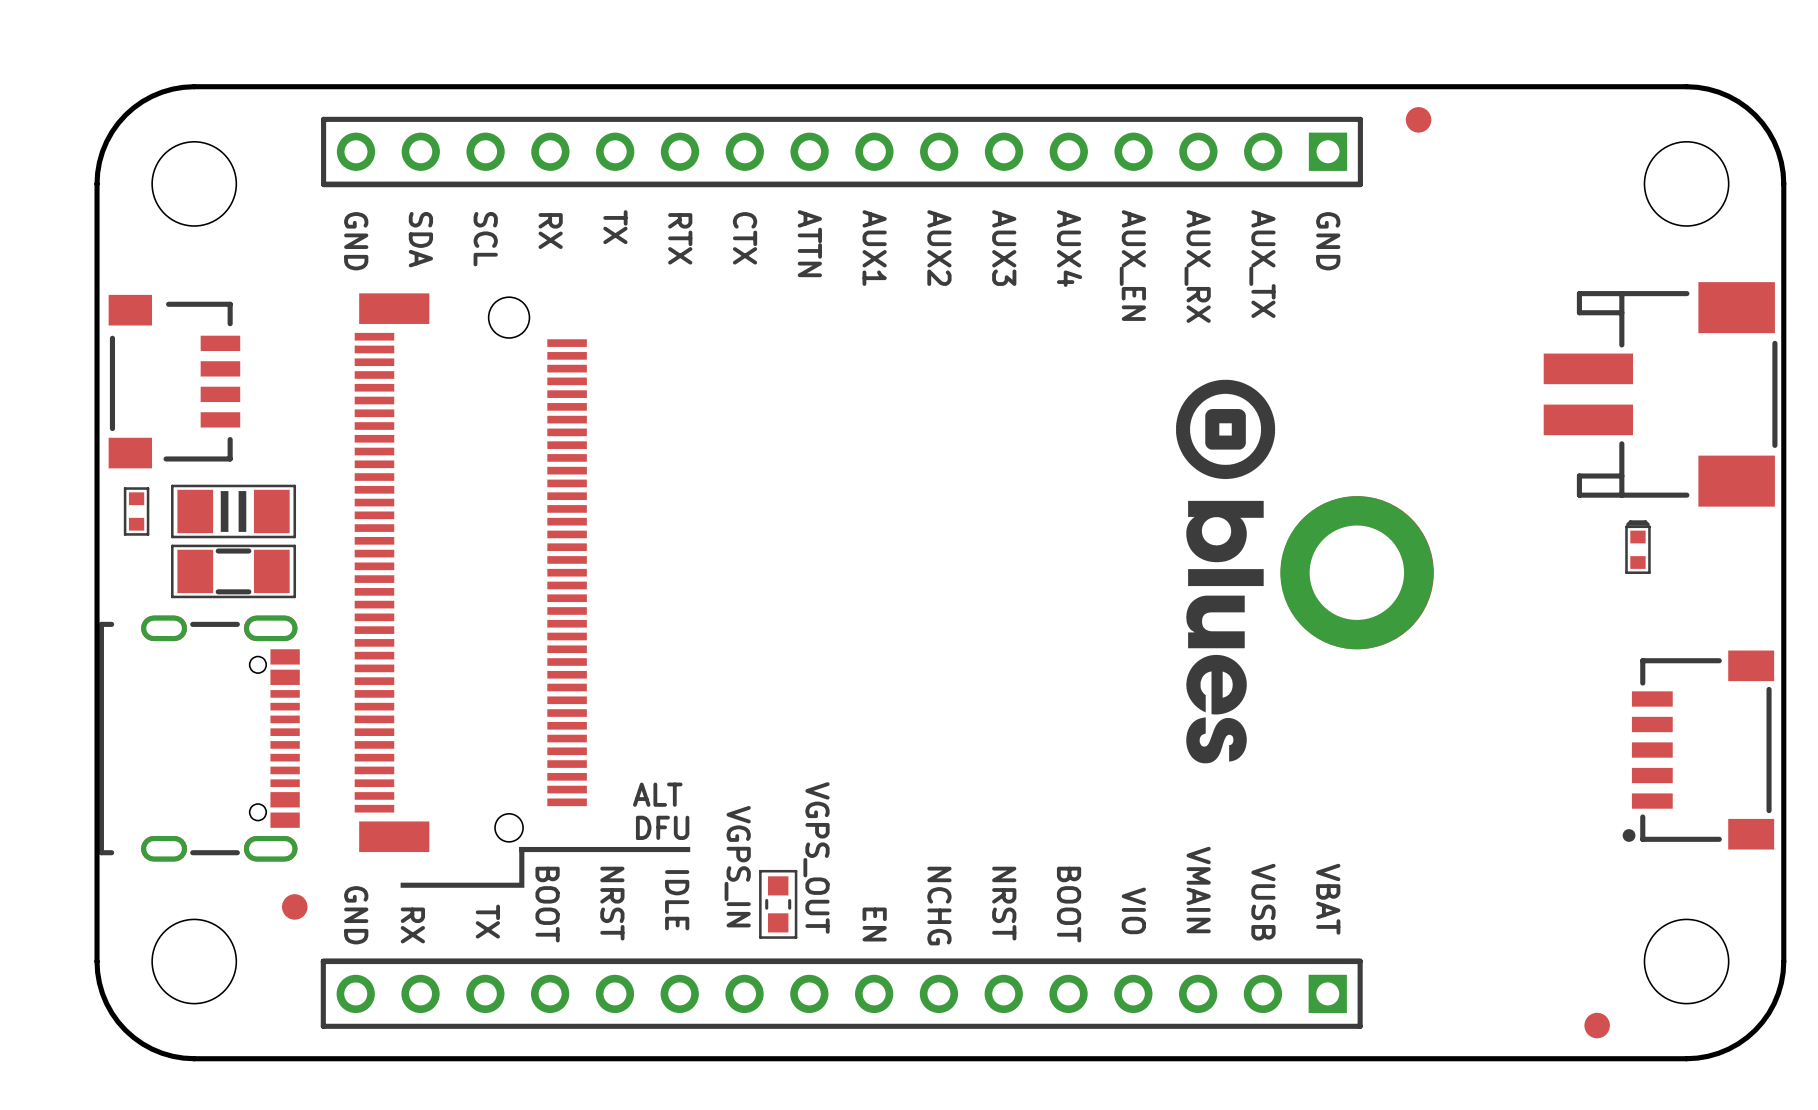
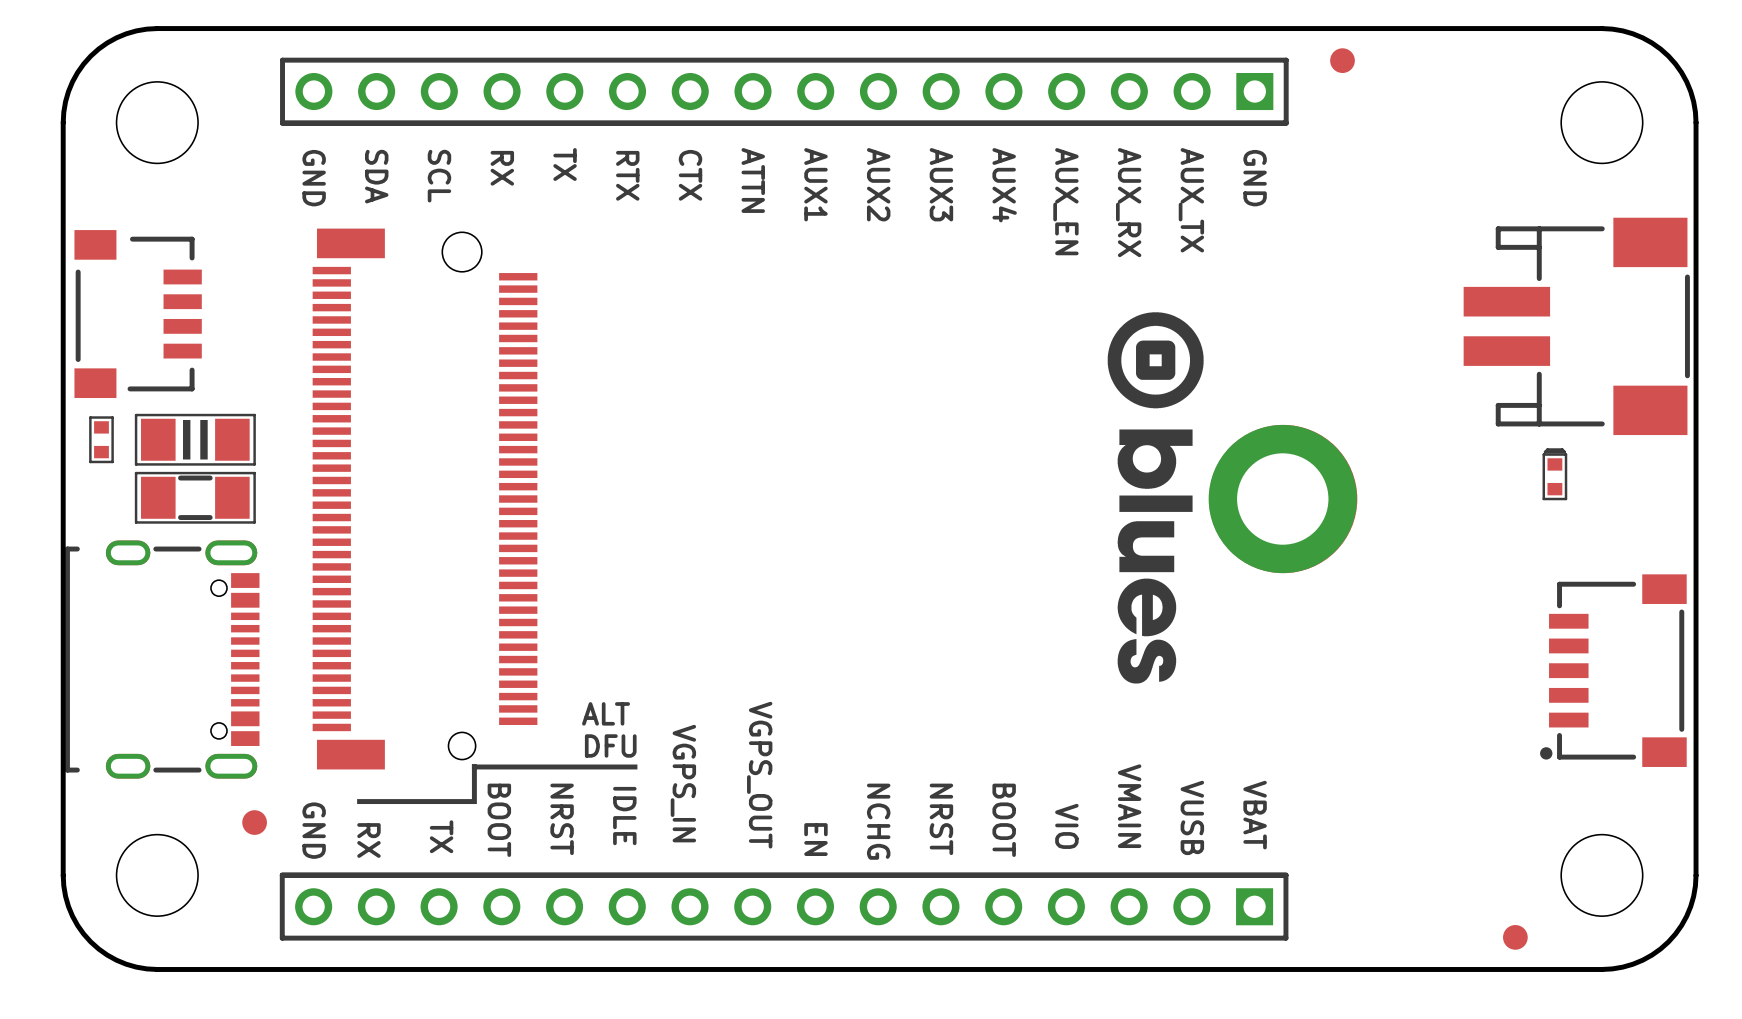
part: (778, 904) -> none

